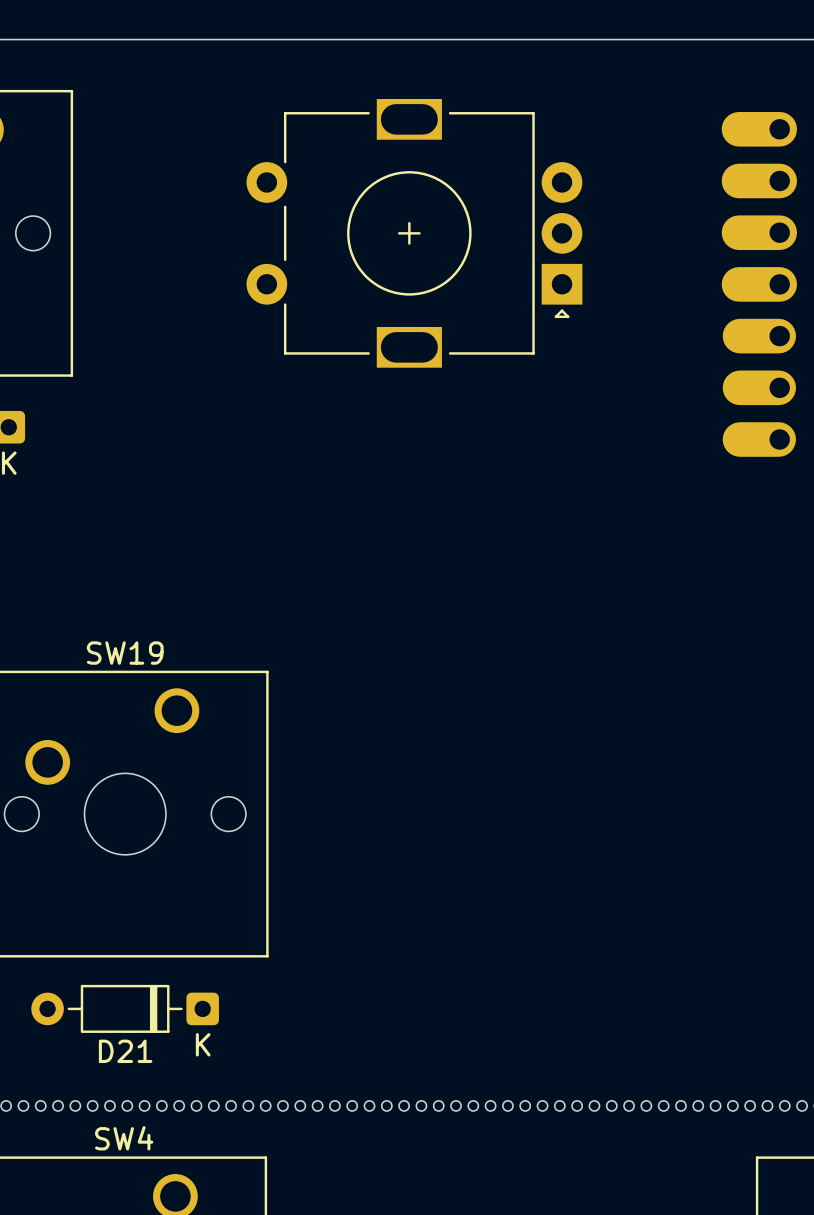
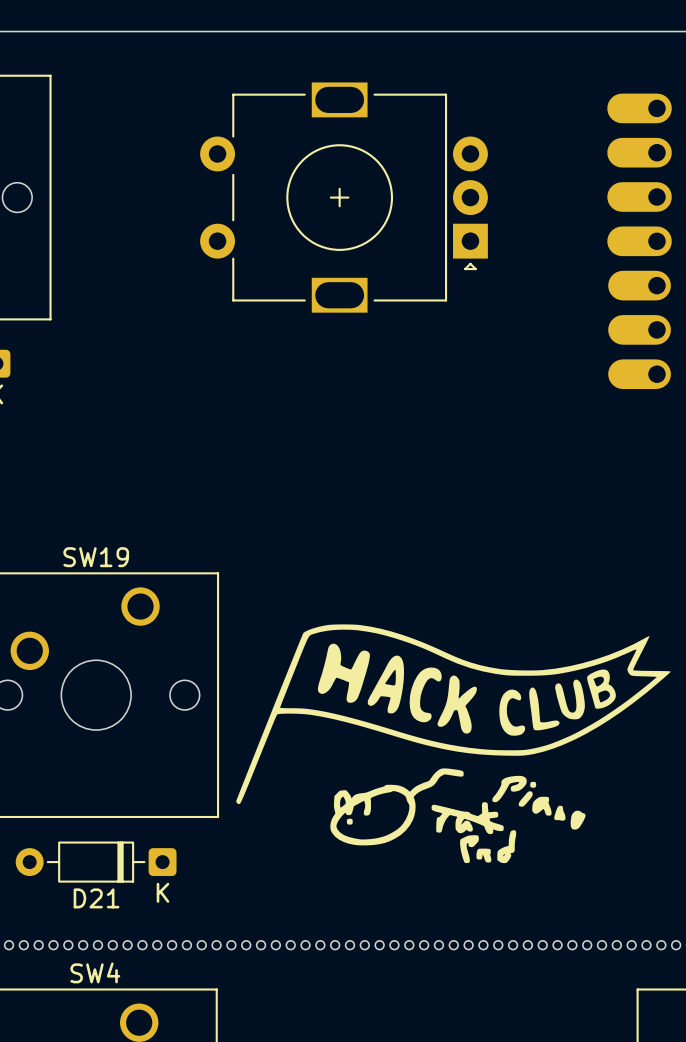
drawing: none -> [236, 624, 671, 864]

